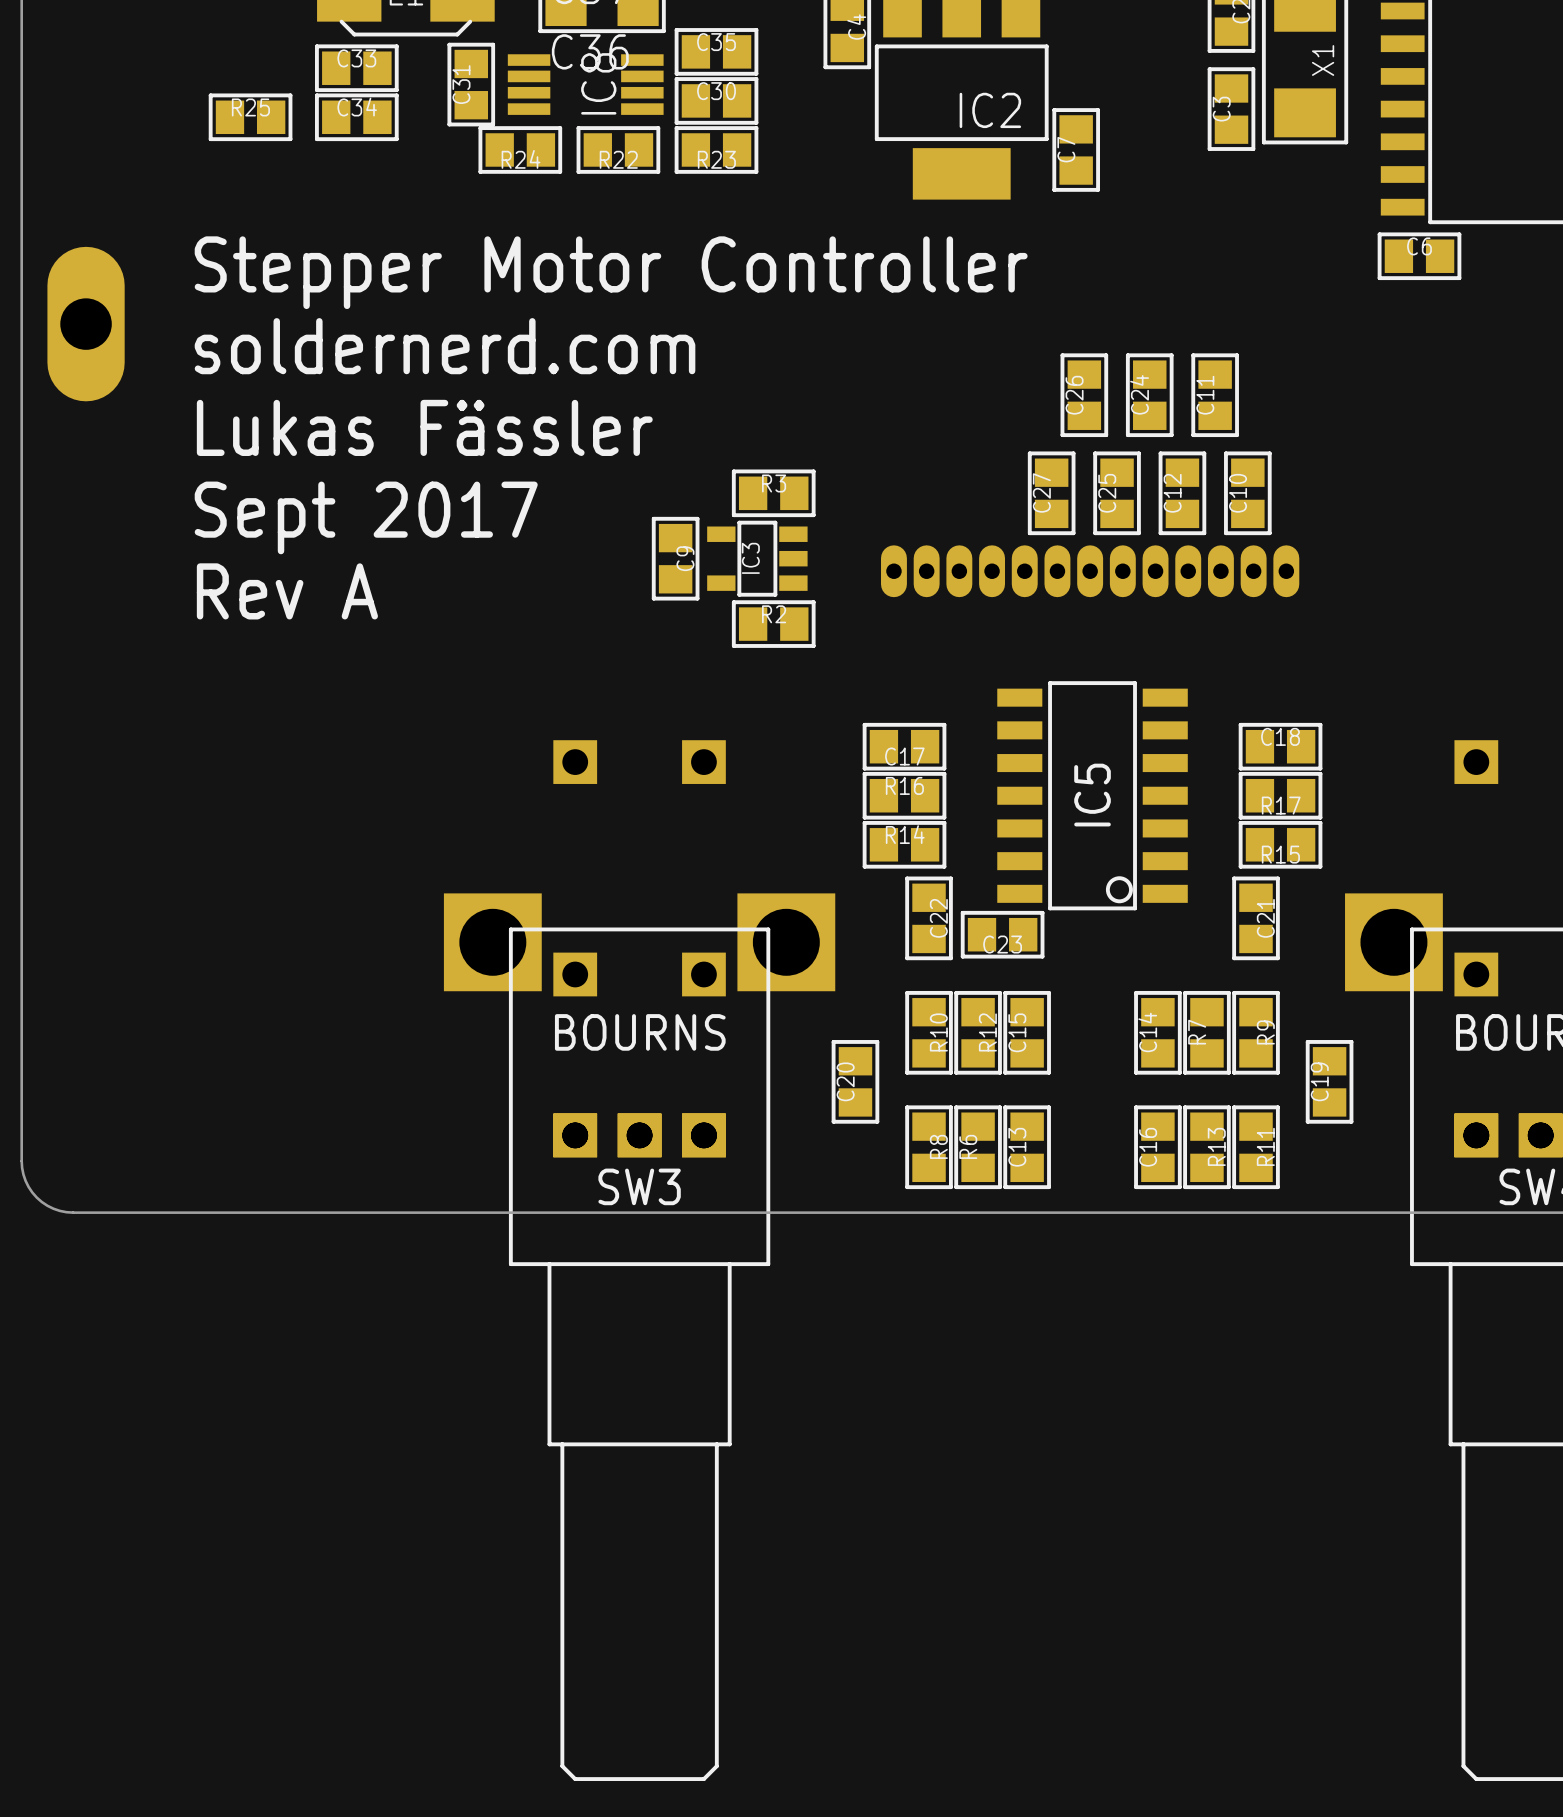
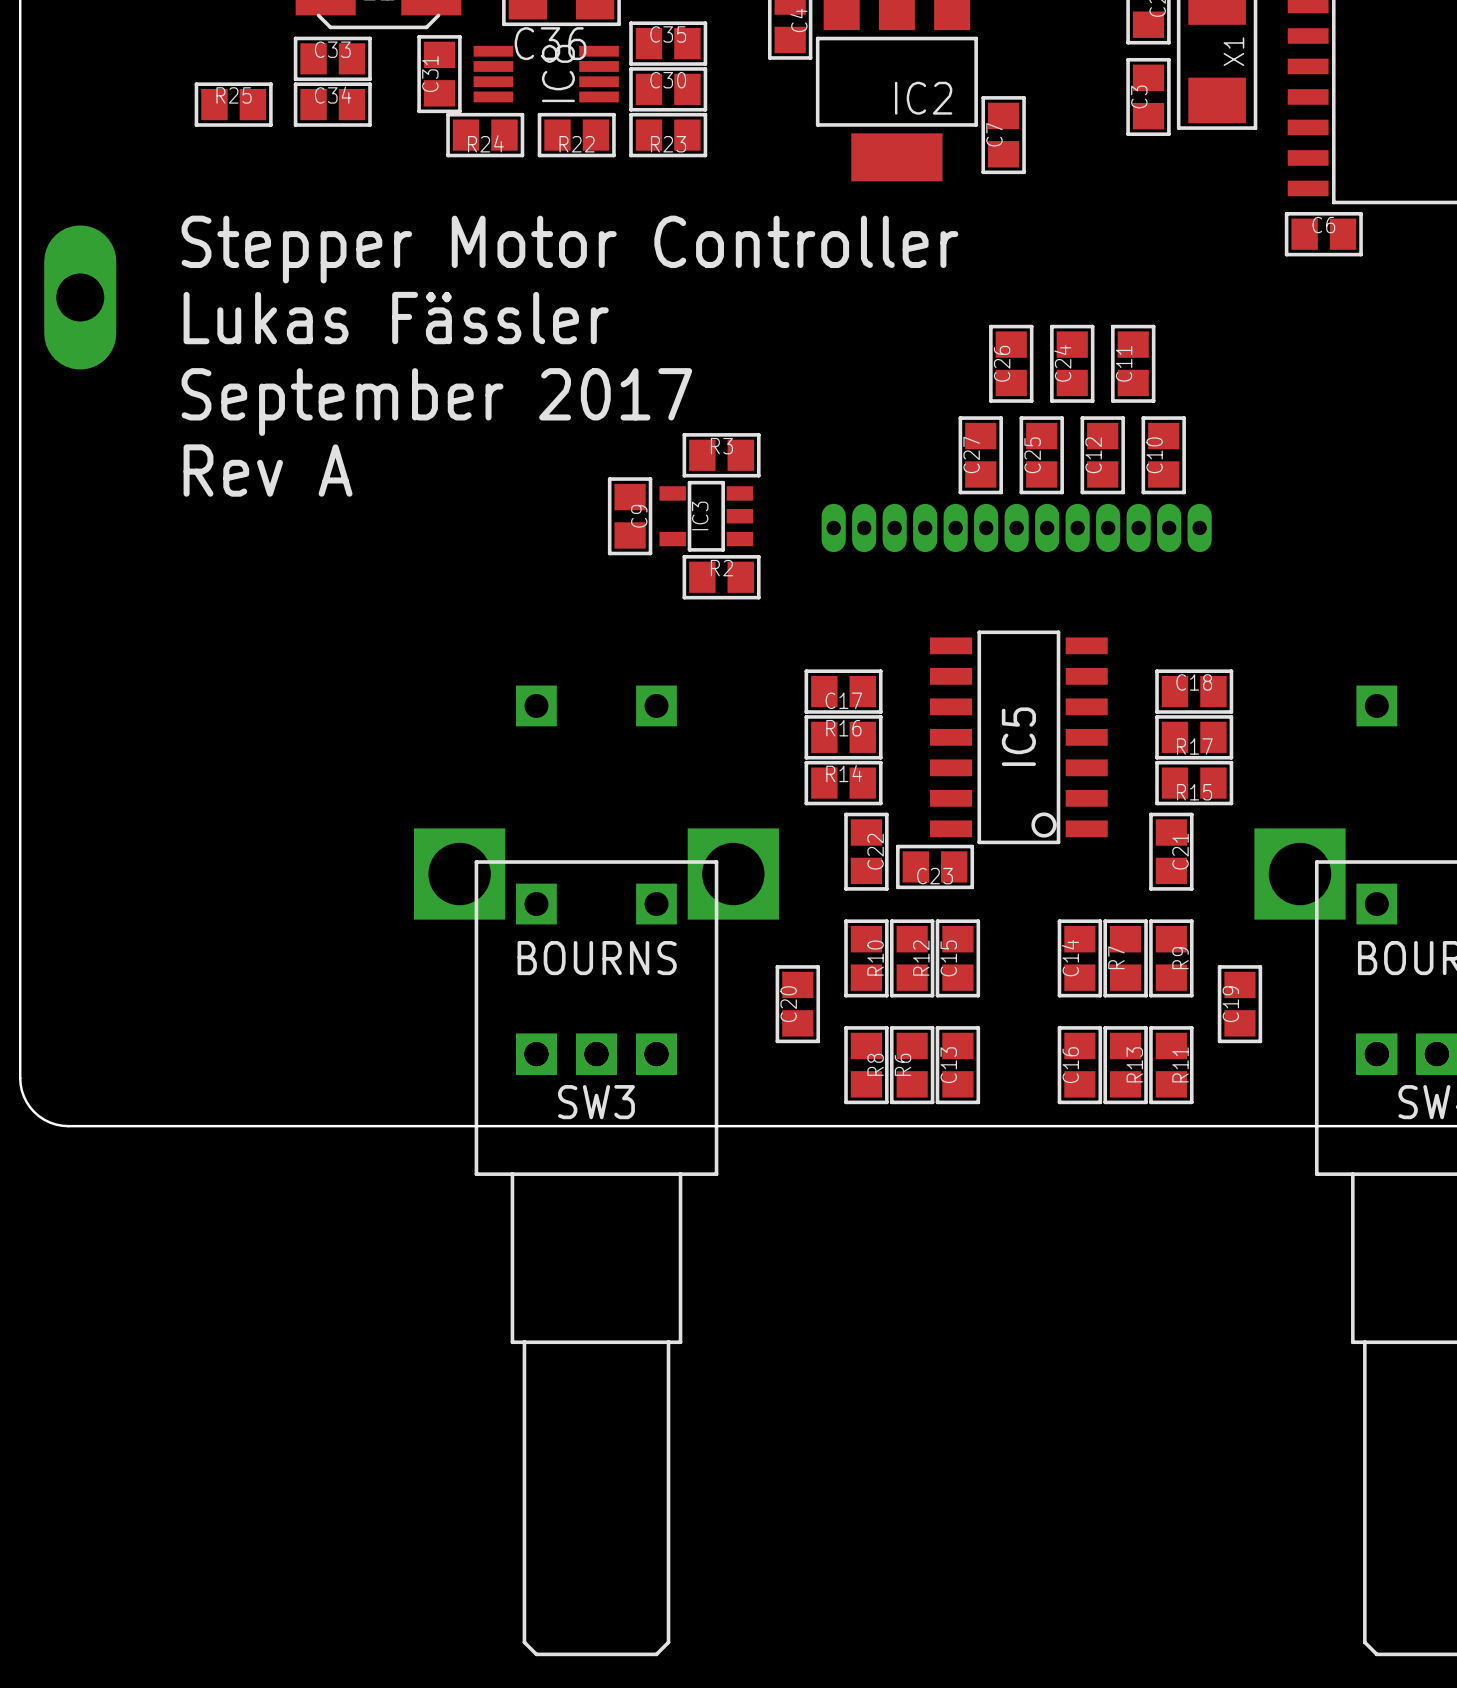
text: soldernerd.com (445, 346) -> Lukas Fässler (396, 318)
text: Lukas Fässler (424, 427) -> September 2017 (436, 402)
text: Sept 2017 (366, 517) -> Rev A (268, 470)
text: Rev A (287, 591) -> none

